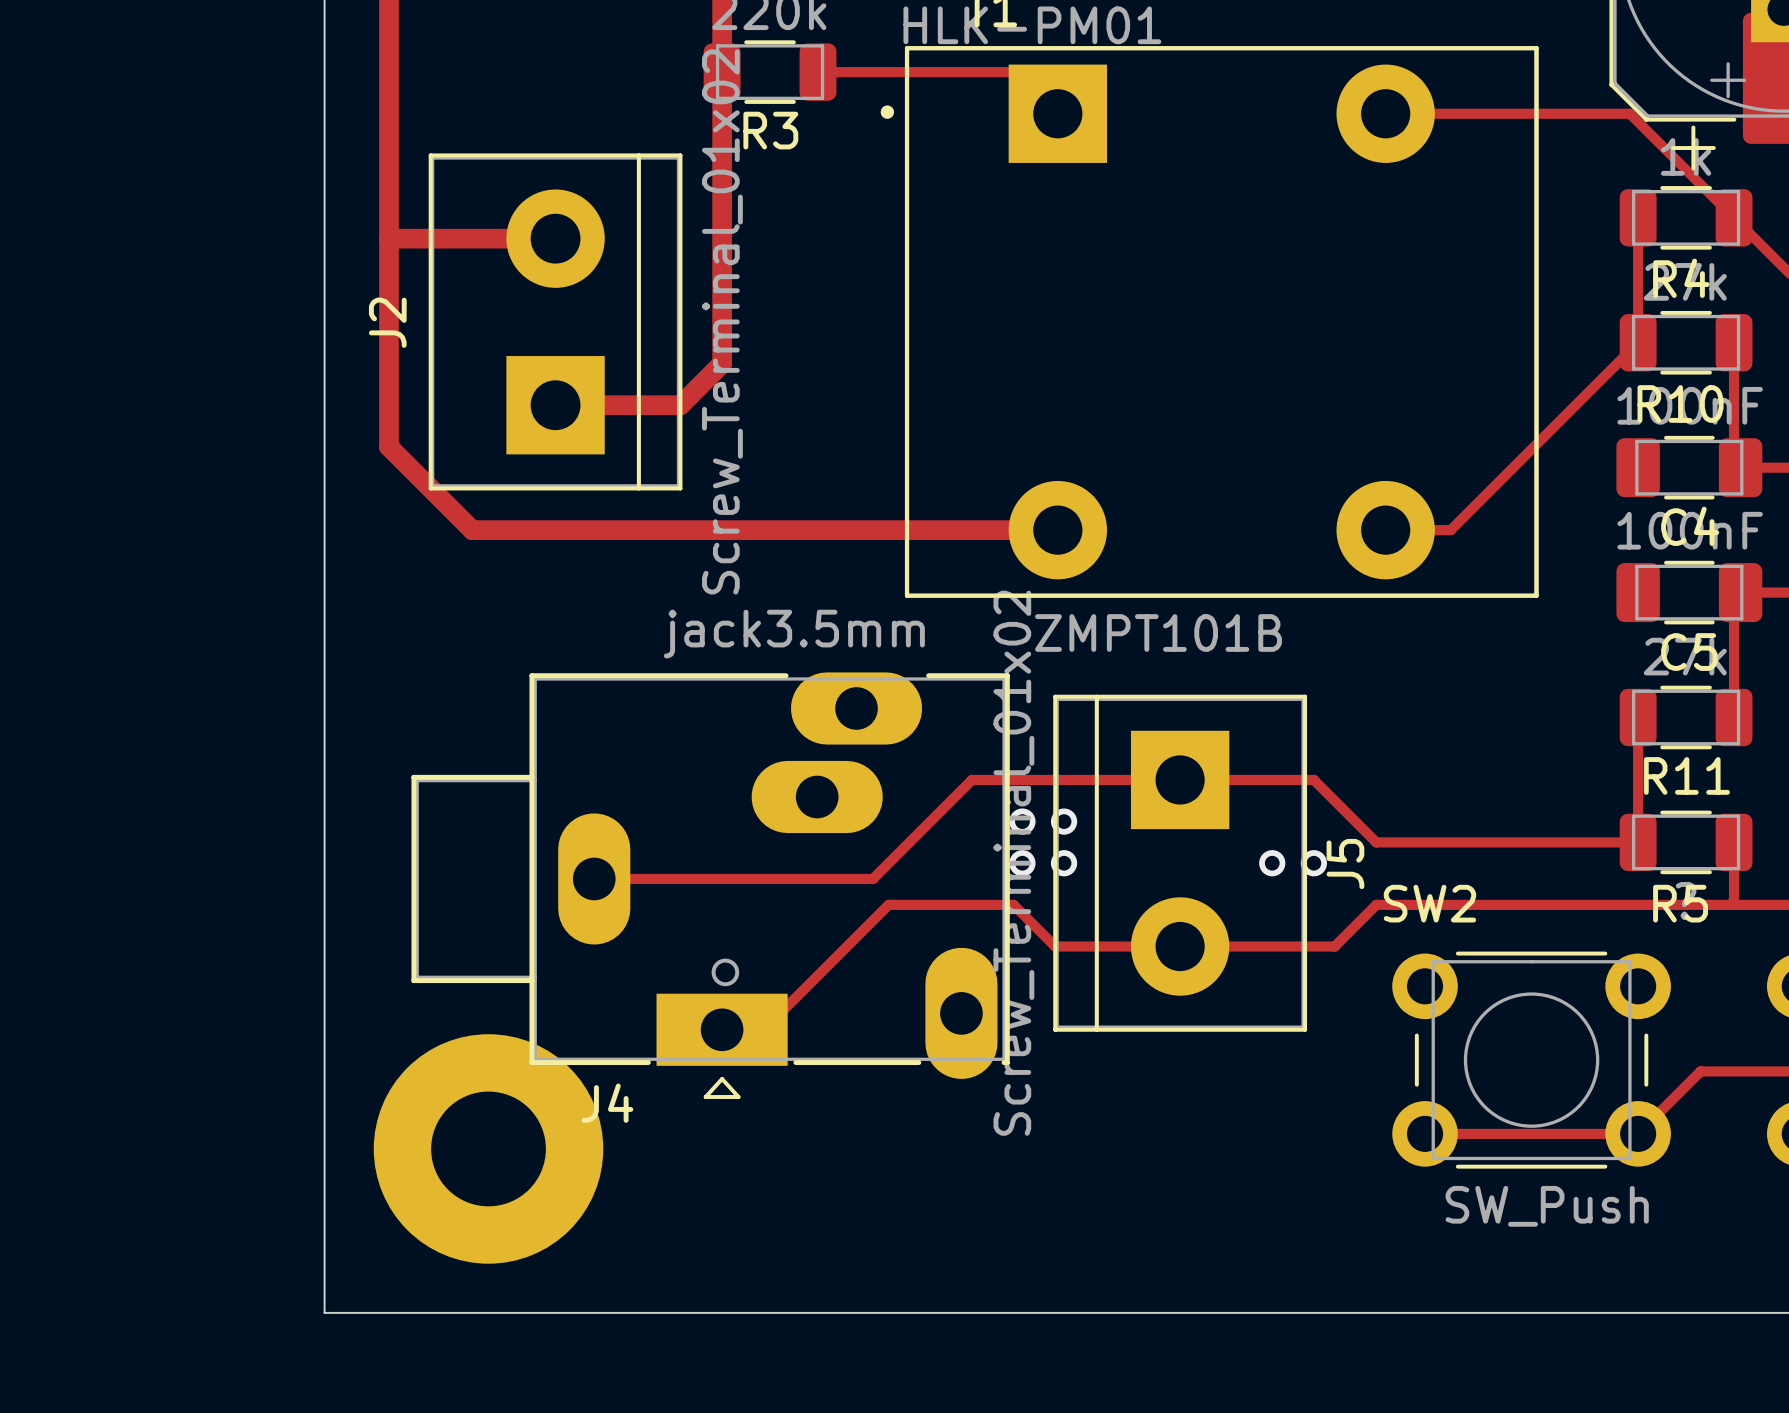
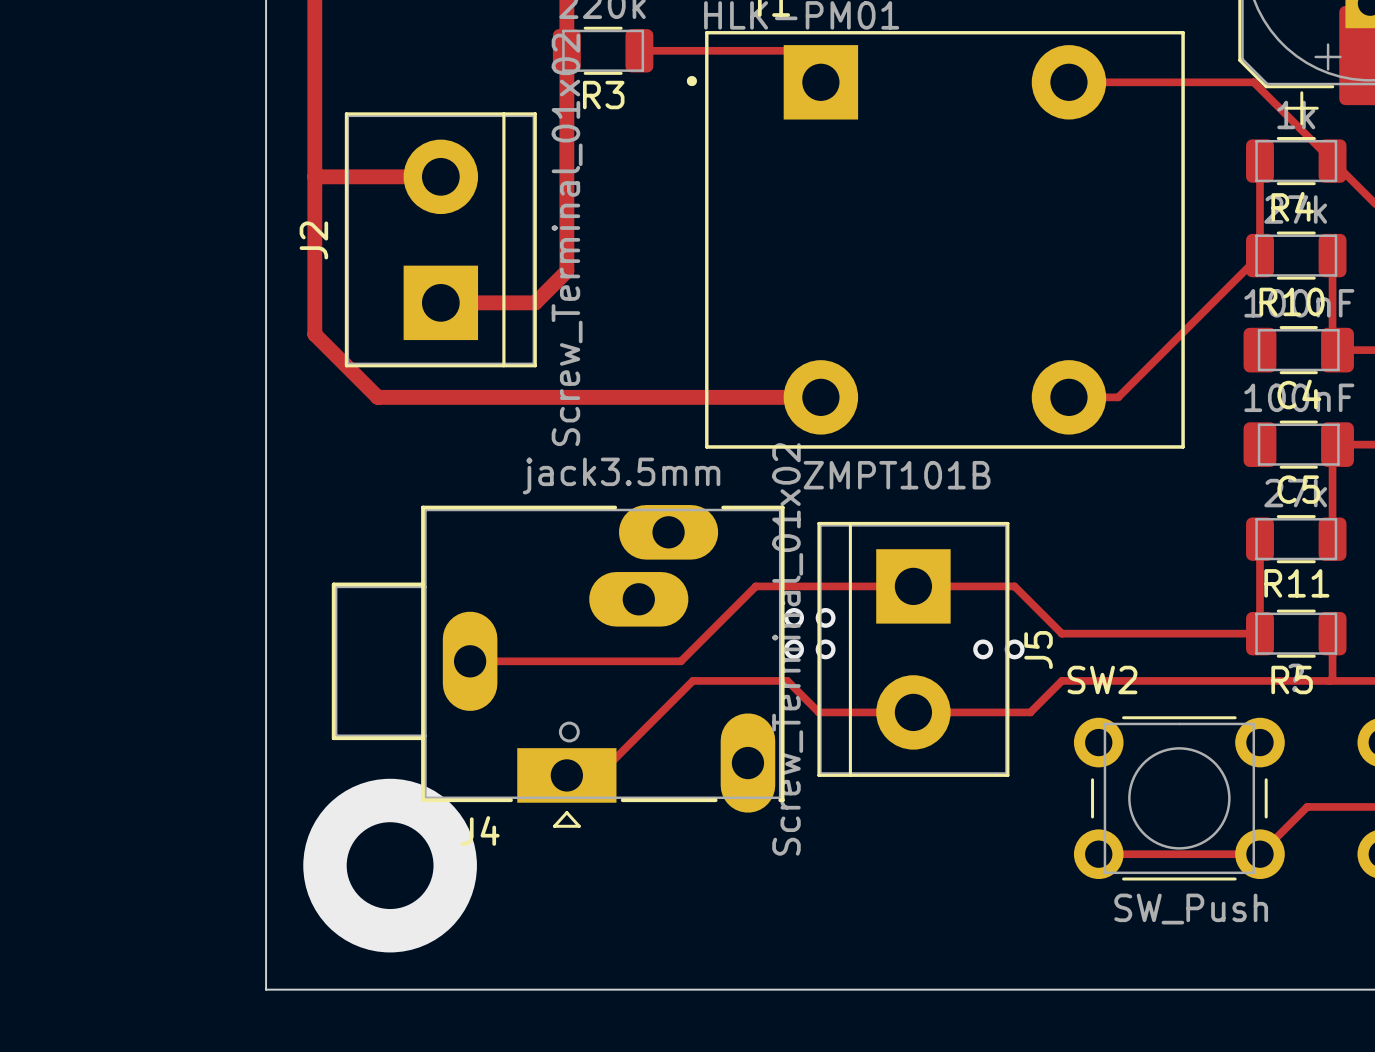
part: (488, 1148) -> none
via: none -> (390, 865)

